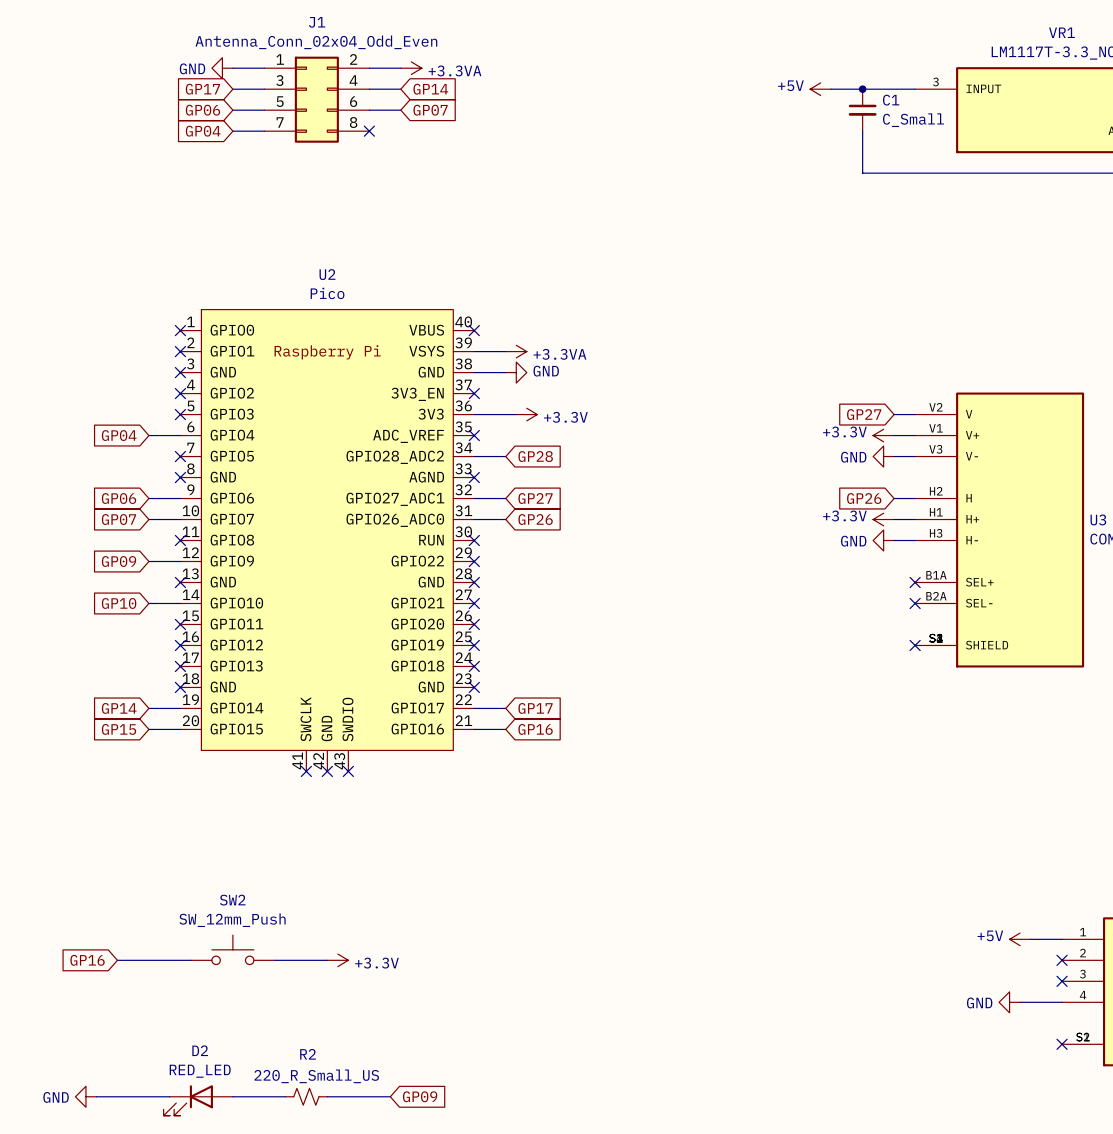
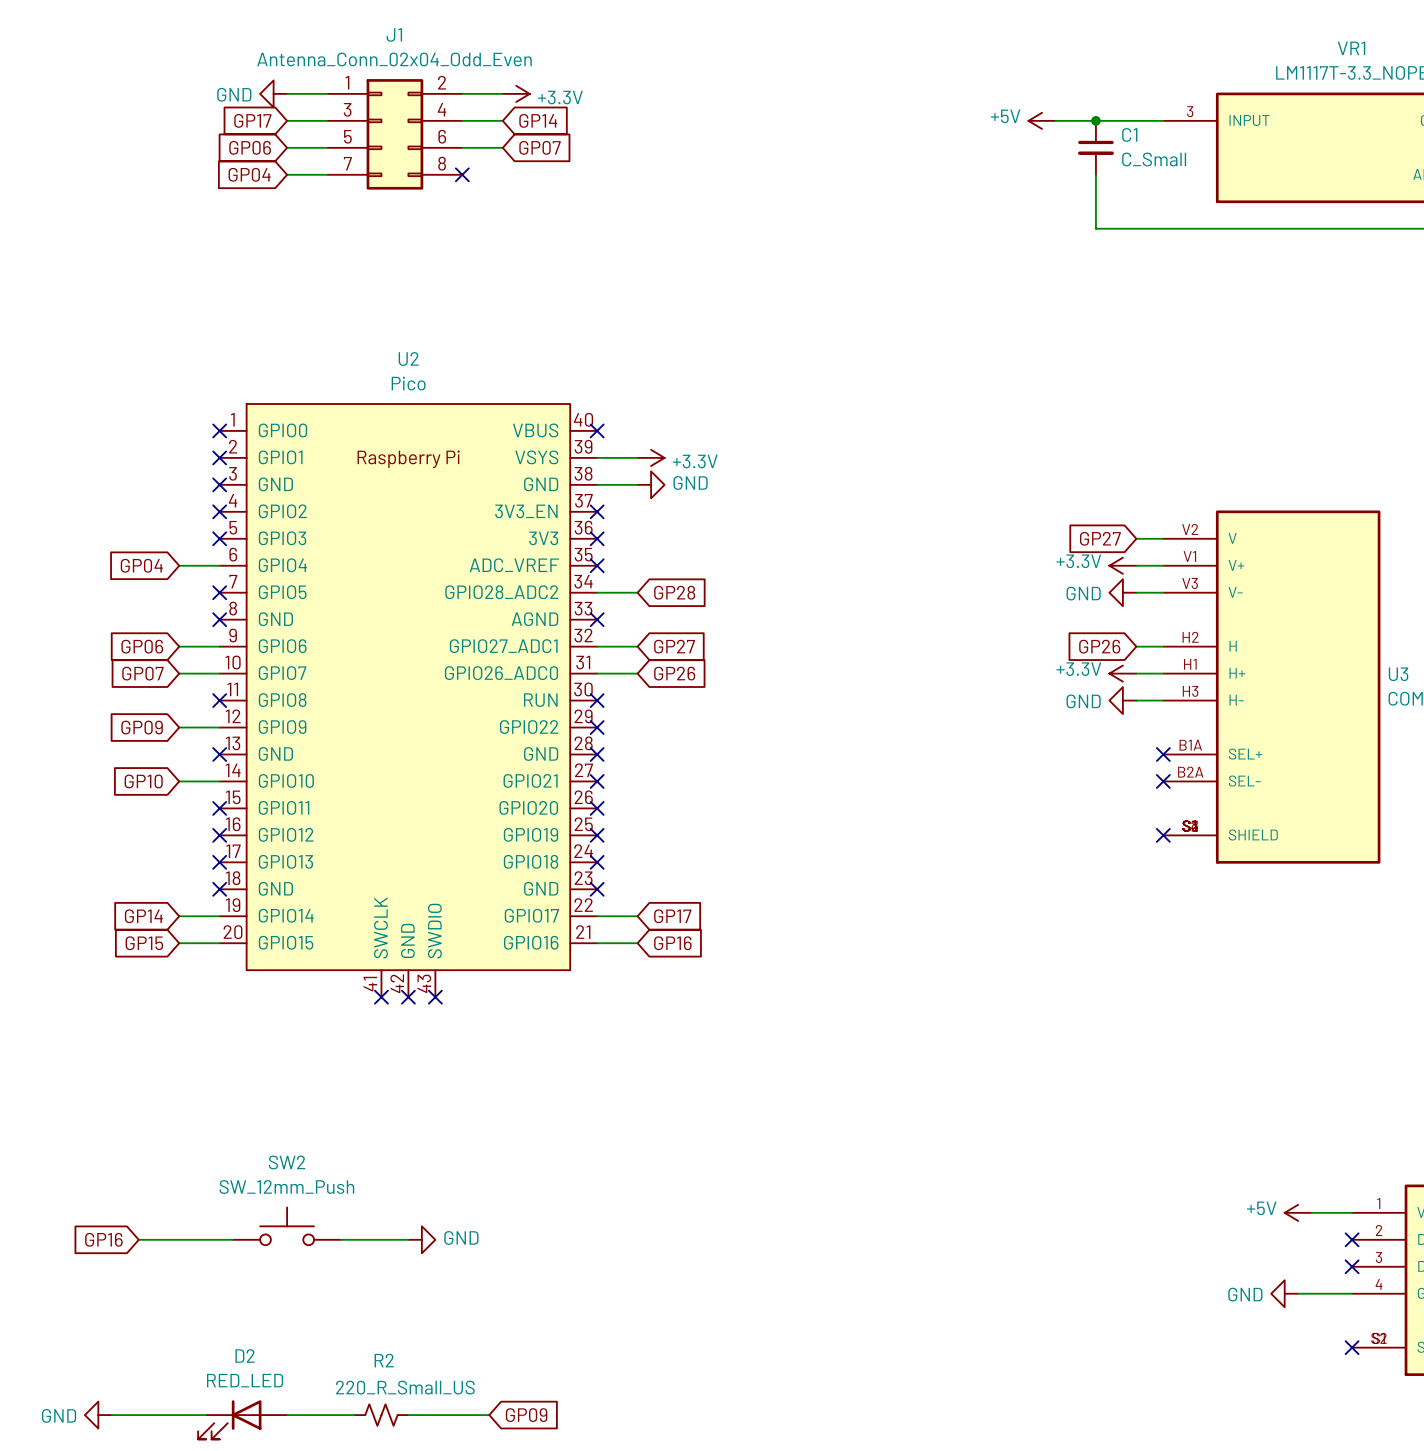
power symbol: +3.3VA (411, 68) -> +3.3V (516, 93)
power symbol: +3.3VA (516, 351) -> +3.3V (651, 457)
wire: (474, 414) (516, 414) -> none
no-connect mark: none -> (597, 538)
power symbol: +3.3V (526, 414) -> none
power symbol: +3.3V (337, 960) -> GND (421, 1239)

